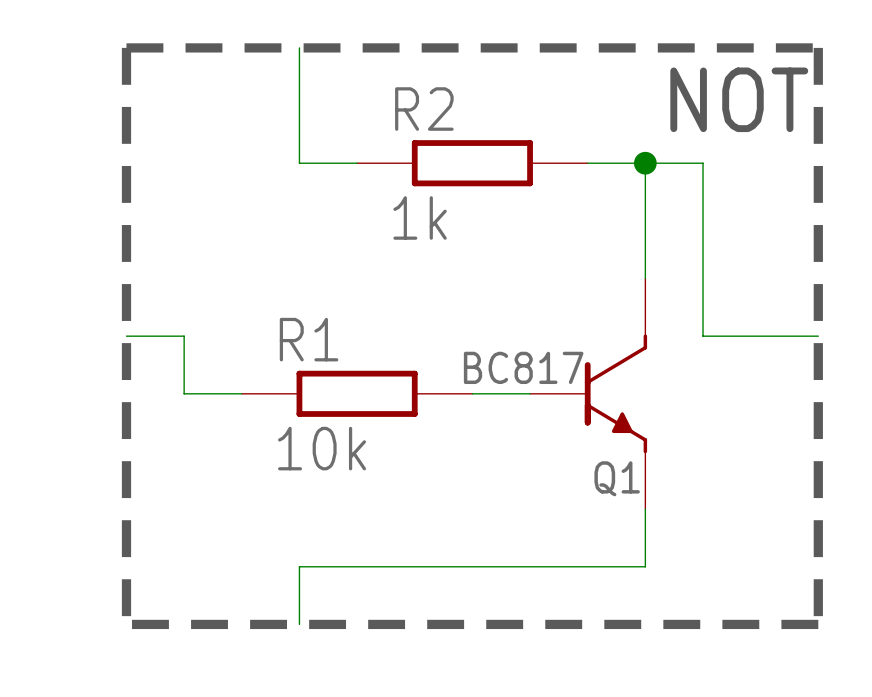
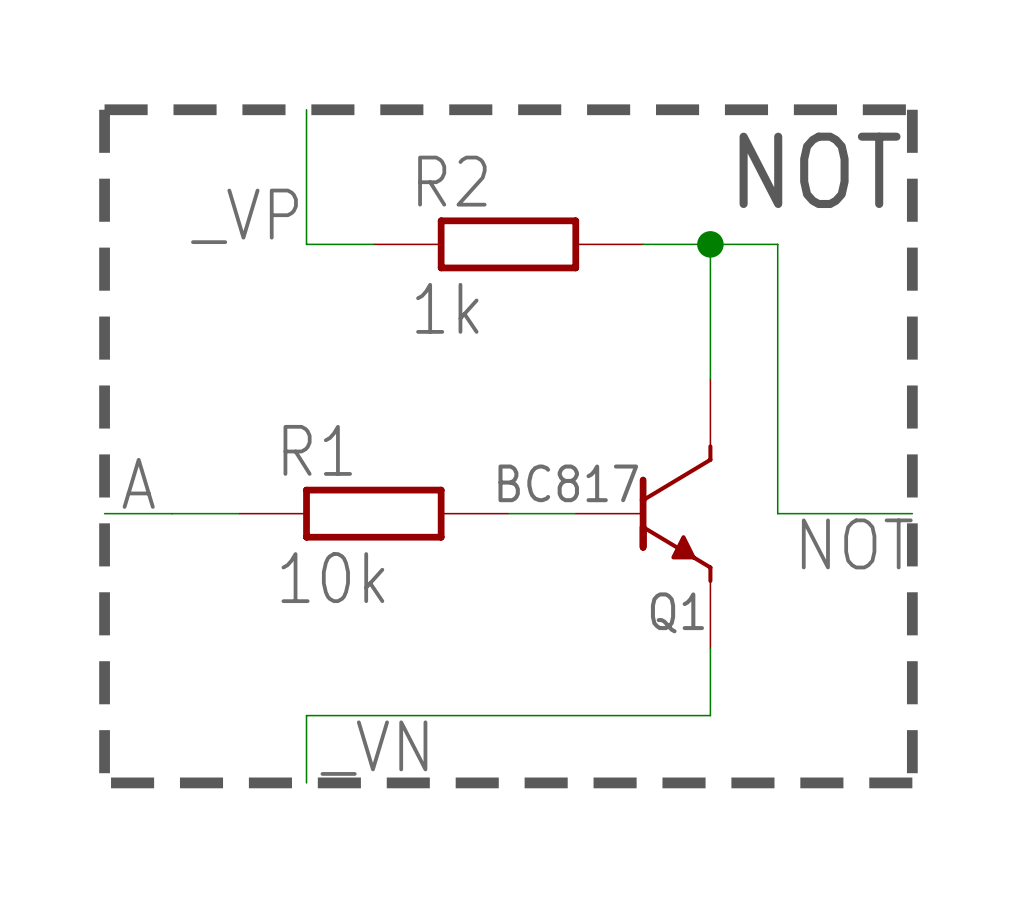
label: none -> _VP (244, 216)
wire: (126, 336) (184, 336) (184, 393) -> (104, 513) (171, 513)
wire: (703, 336) (818, 336) -> (777, 446) (777, 513) (912, 513)
label: none -> A (138, 483)
label: none -> NOT (857, 543)
label: none -> _VN (373, 748)

